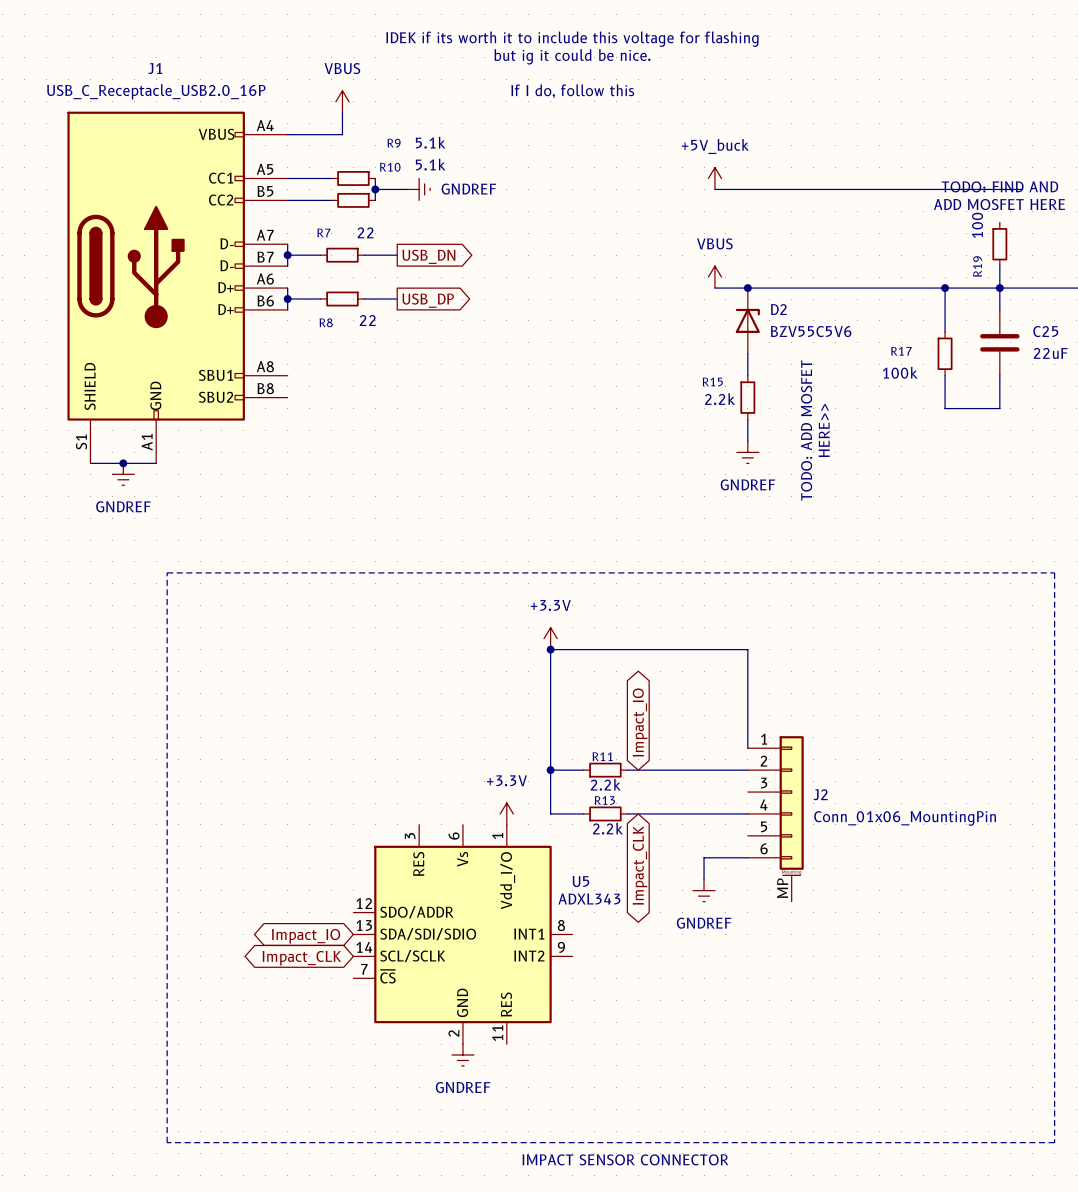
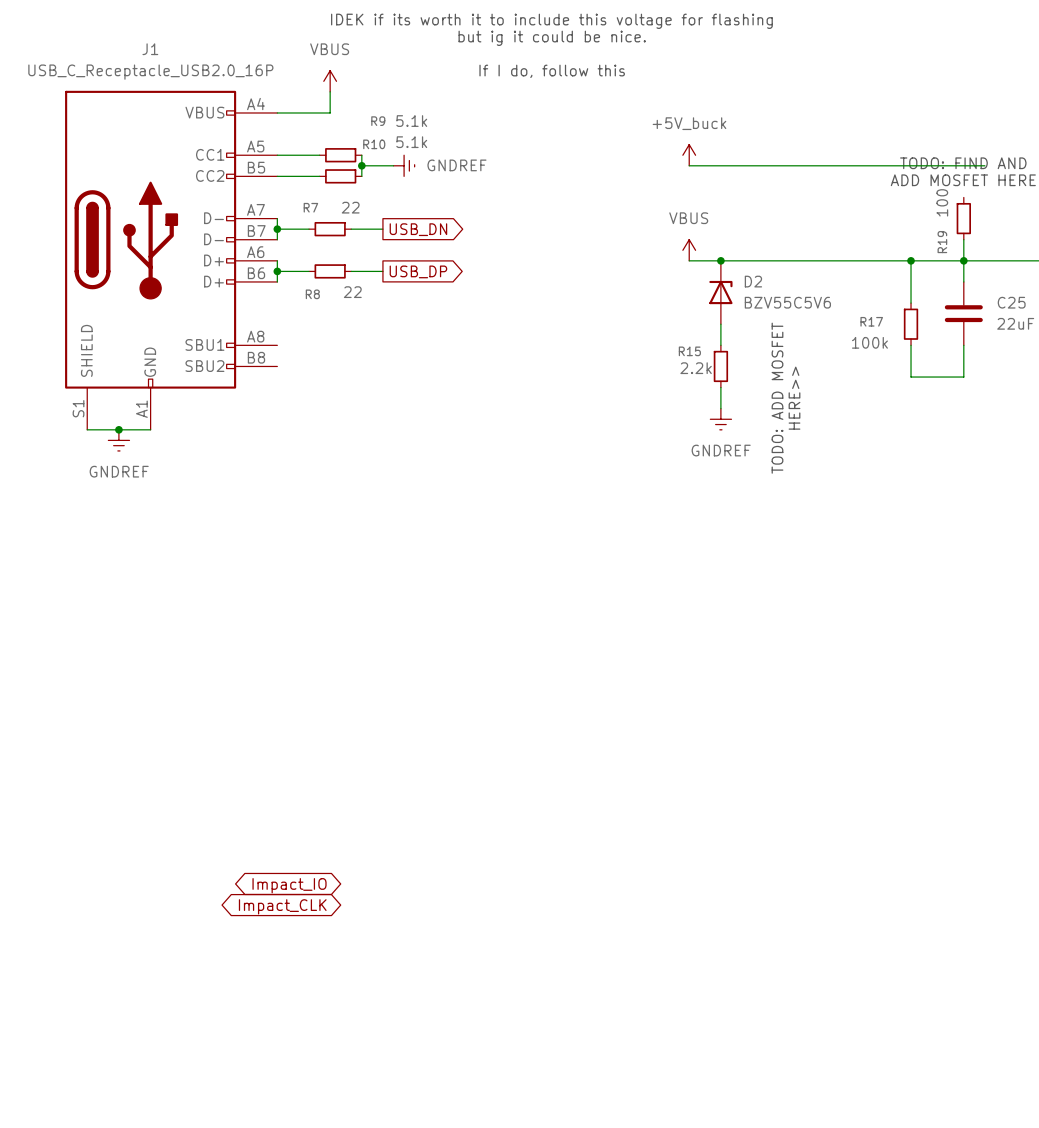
line: (167, 572) (1054, 572) (1054, 1142) (167, 1142) (167, 572) -> none
power symbol: +3.3V (550, 638) -> none
junction: (550, 649) -> none
global label: Impact_IO (640, 722) -> none
wire: (747, 748) (747, 649) (550, 649) (550, 813) (583, 813) -> none
wire: (550, 770) (583, 770) -> none
junction: (550, 770) -> none
R11: 2.2k (605, 770) -> none
wire: (627, 770) (747, 770) -> none
power symbol: +3.3V (506, 813) -> none
R13: 2.2k (605, 813) -> none
wire: (627, 813) (747, 813) -> none
J2: Conn_01x06_MountingPin (775, 818) -> none
wire: (747, 857) (704, 857) (704, 879) -> none
global label: Impact_CLK (640, 865) -> none
power symbol: GNDREF (704, 890) -> none
U5: ADXL343 (462, 934) -> none
power symbol: GNDREF (462, 1055) -> none
text: IMPACT SENSOR CONNECTOR (625, 1159) -> none

